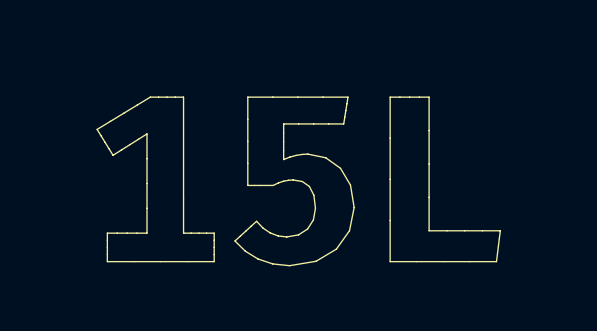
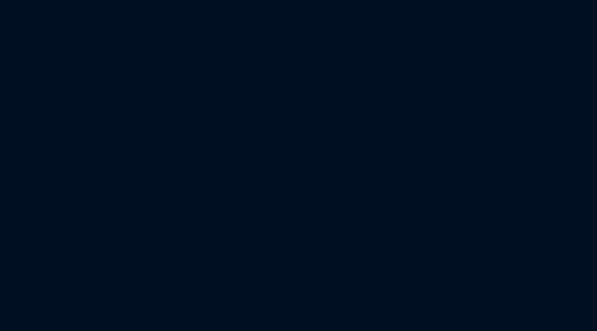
line: (150, 97) (183, 97) (183, 233) (214, 233) (214, 261) (107, 261) (107, 233) (146, 233) (146, 133) (113, 155) (97, 129) (150, 97) -> none
line: (247, 97) (347, 97) (343, 123) (283, 123) (283, 159) (307, 154) (325, 157) (340, 168) (350, 185) (354, 207) (349, 230) (336, 249) (315, 261) (289, 265) (272, 263) (257, 258) (245, 251) (234, 240) (256, 221) (262, 228) (278, 235) (298, 234) (307, 229) (313, 219) (315, 208) (313, 195) (309, 186) (302, 181) (288, 180) (273, 185) (247, 185) (247, 97) -> none
line: (390, 97) (390, 261) (496, 261) (500, 230) (429, 230) (429, 97) (390, 97) -> none

